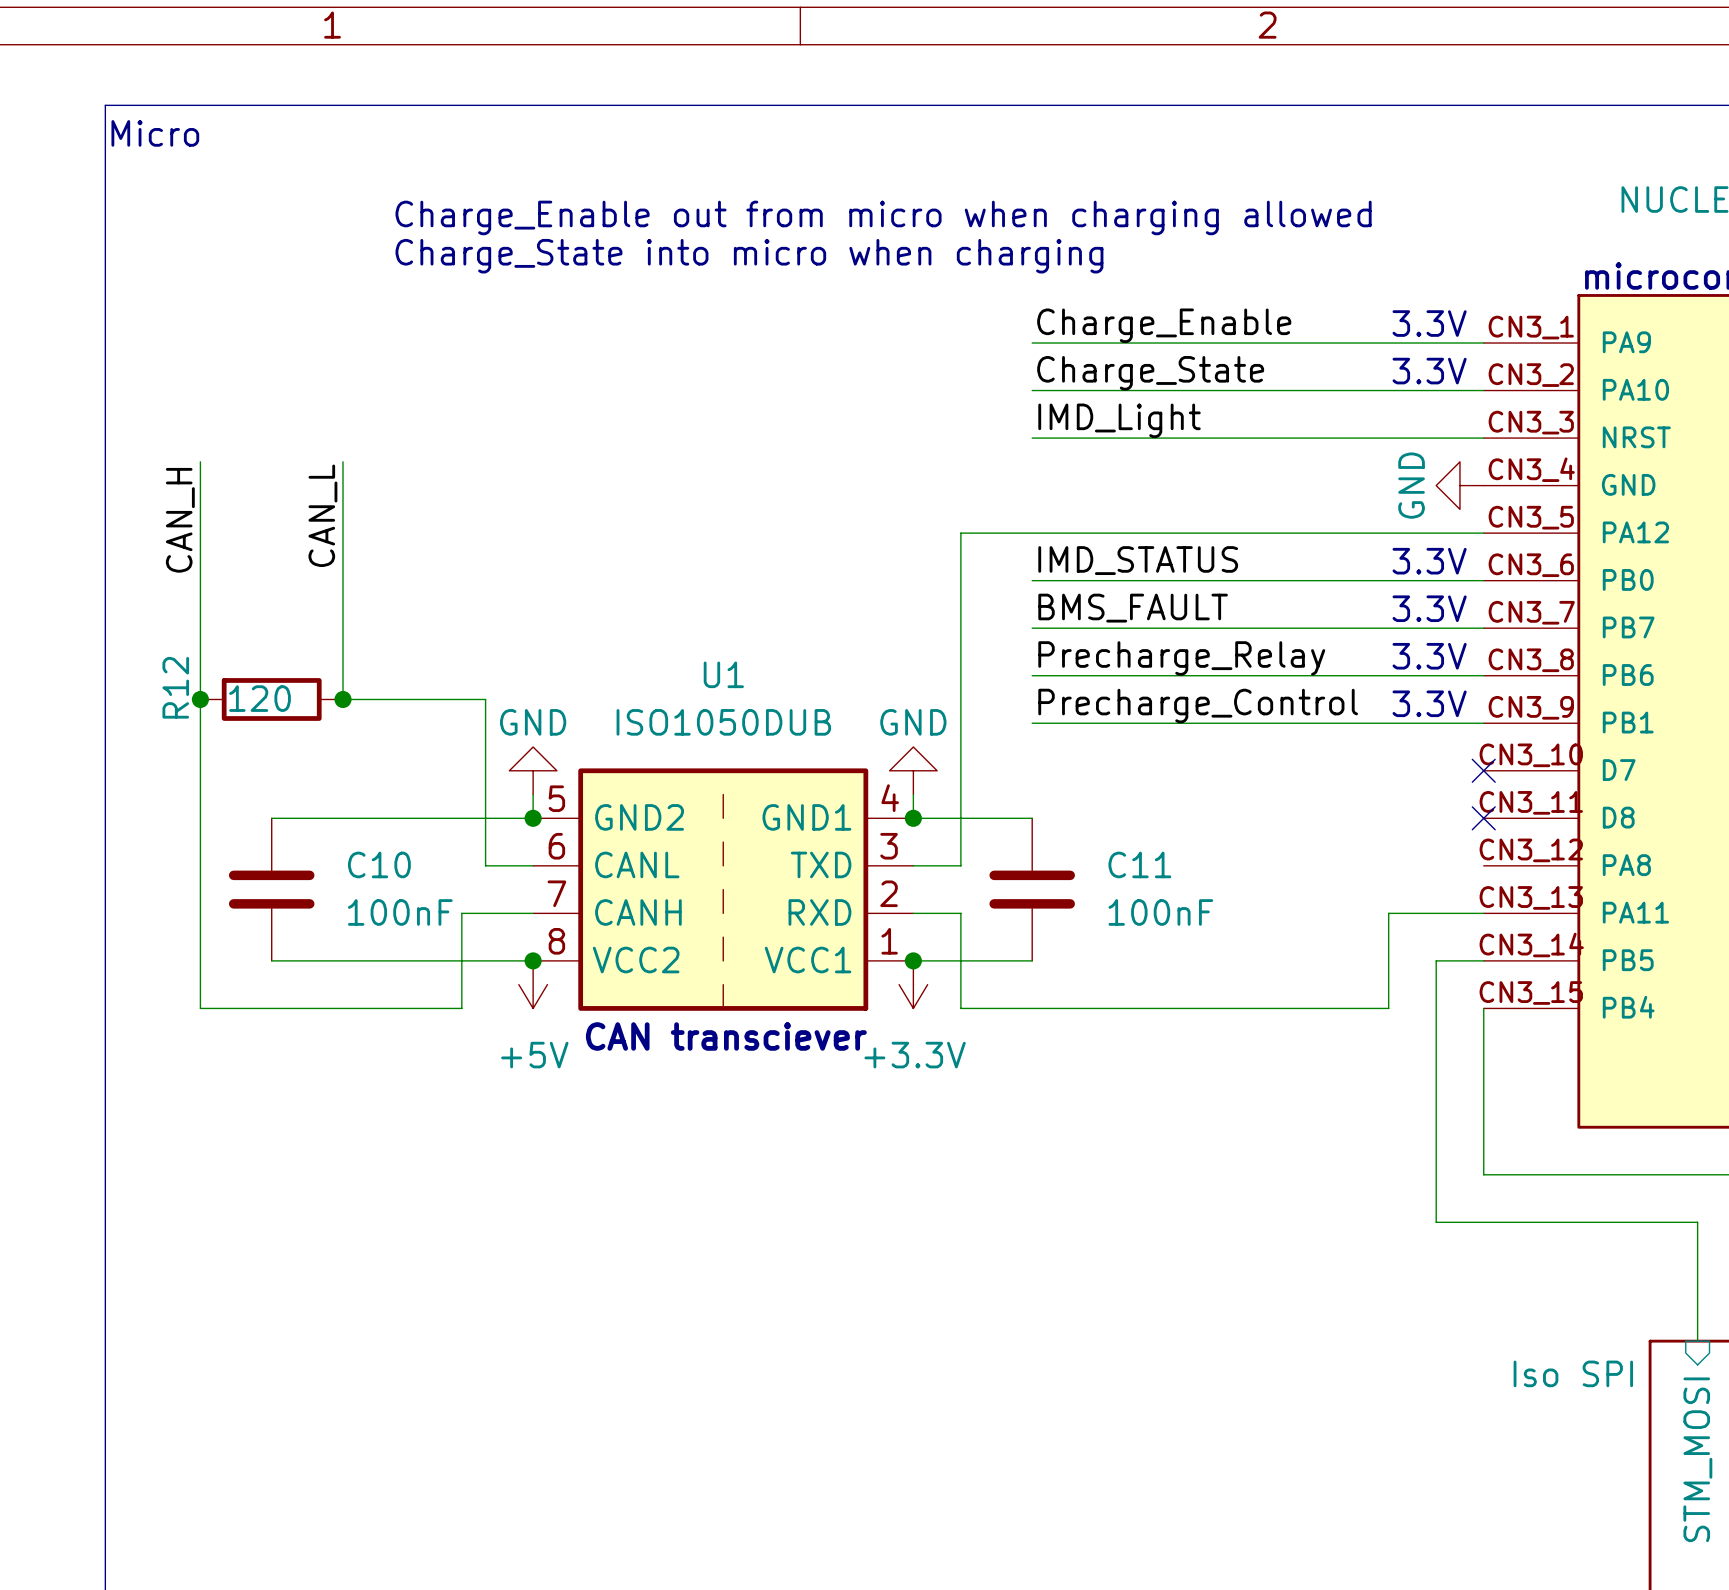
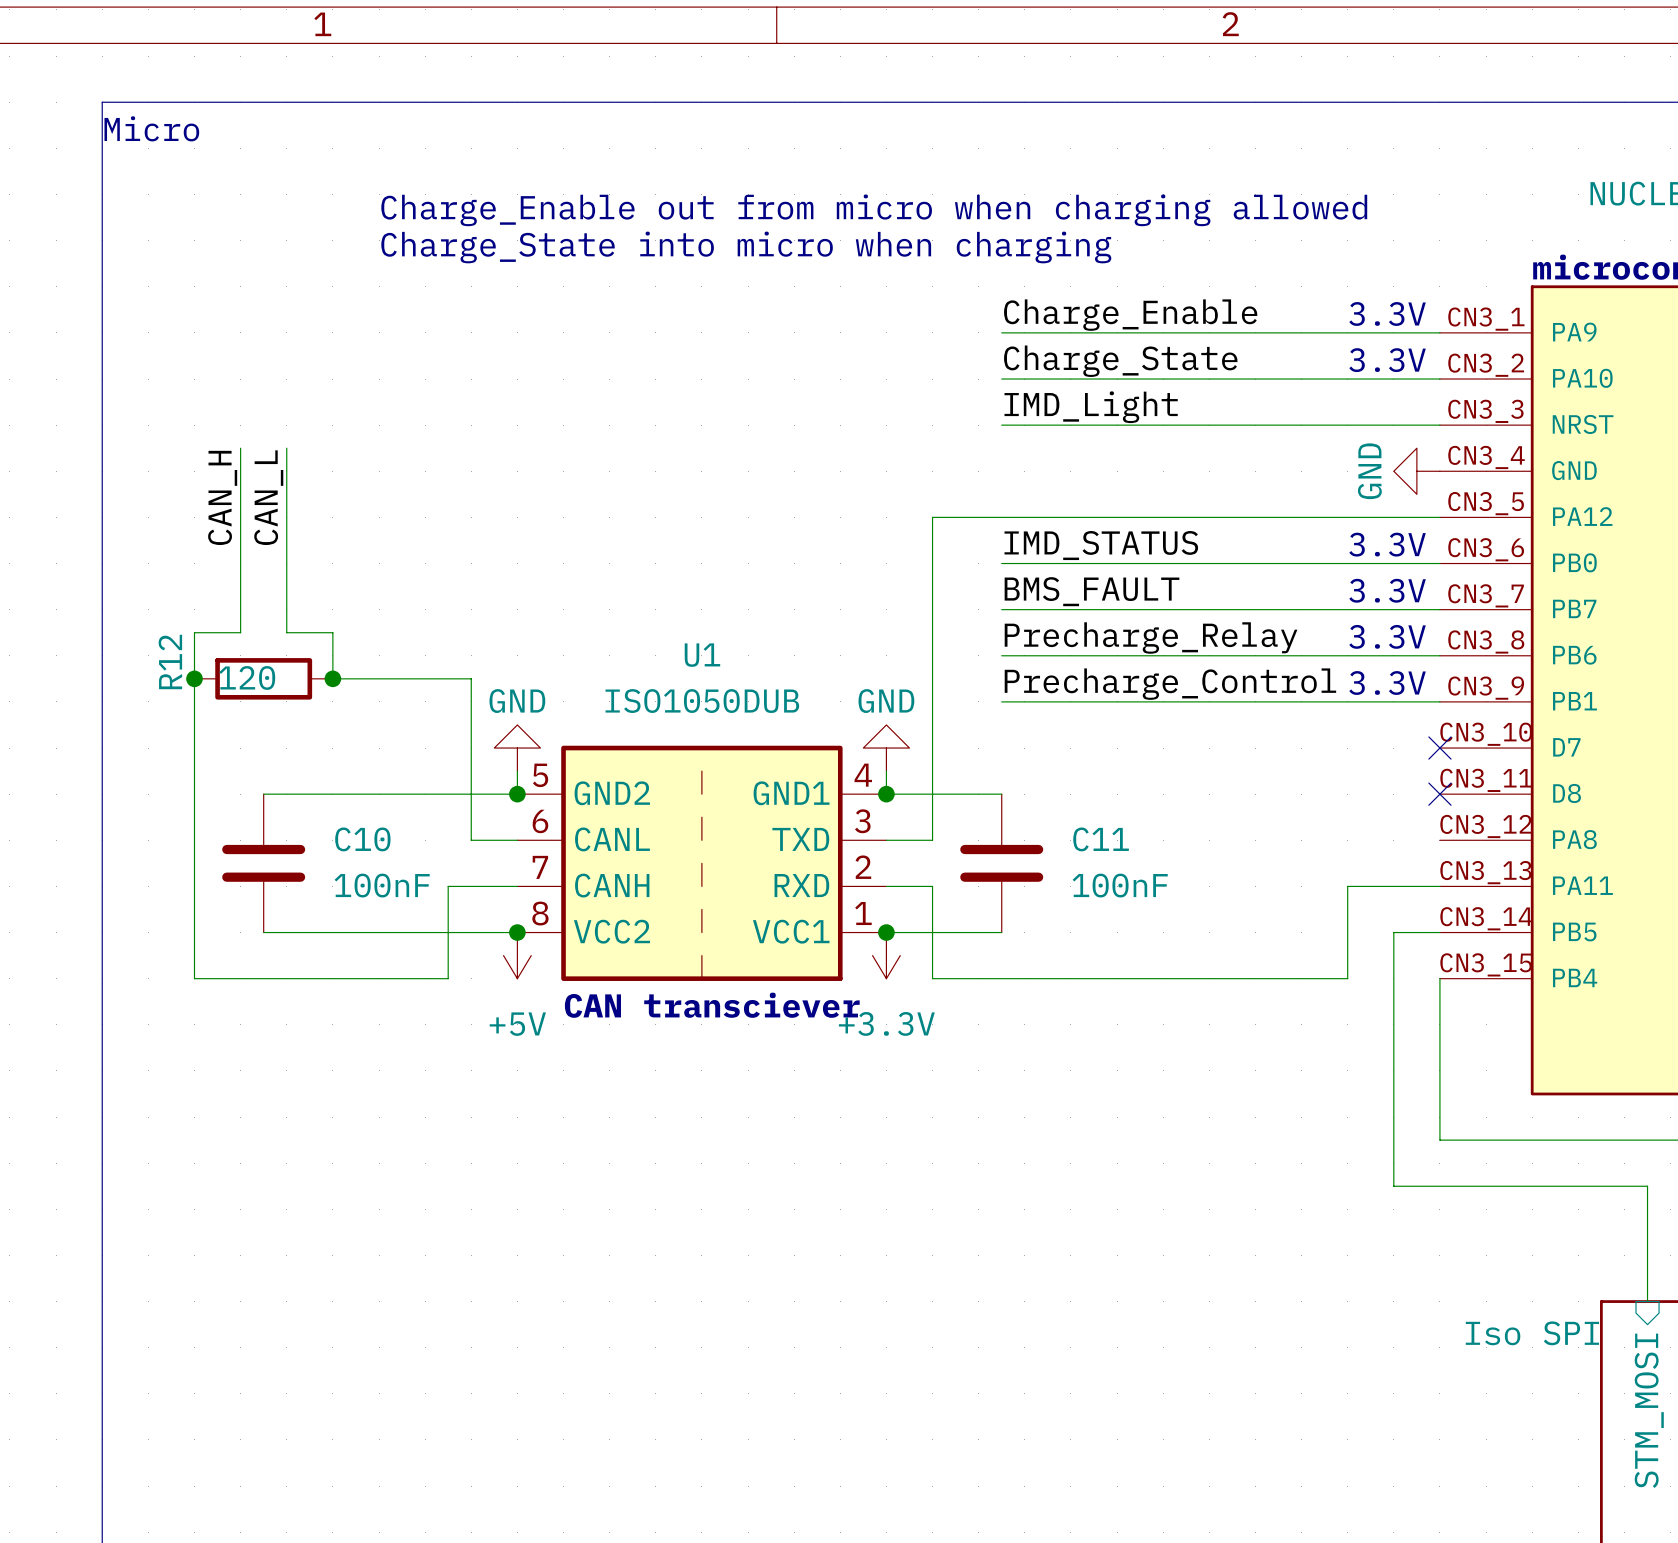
wire: (200, 461) (200, 651) -> (240, 448) (240, 632) (194, 632)
wire: (343, 461) (343, 651) -> (286, 448) (286, 632) (332, 632)
label position: CAN_L (322, 515) -> CAN_L (268, 497)
label position: CAN_H (180, 520) -> CAN_H (222, 497)

